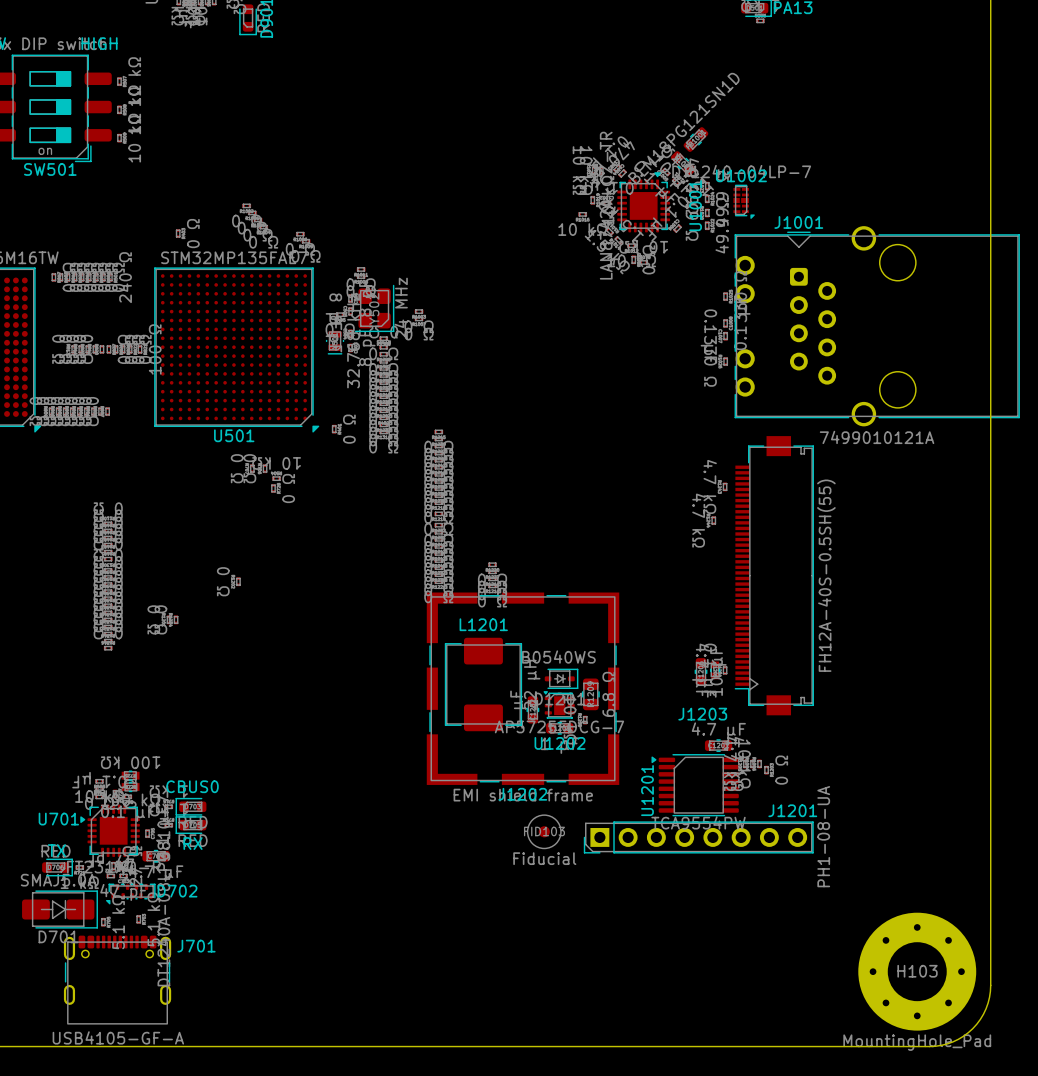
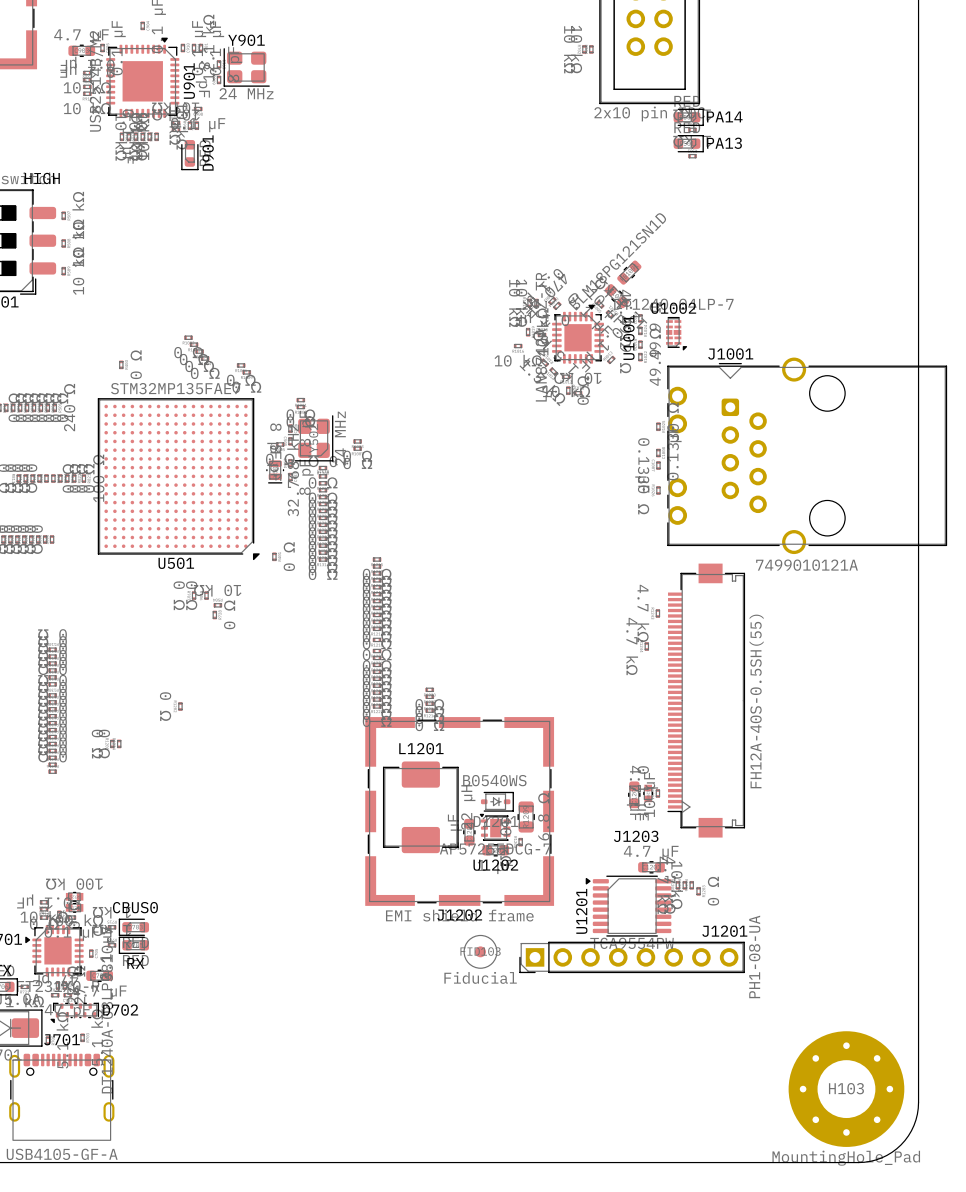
J701 name position: J701 (196, 946) -> J701 (62, 1039)

